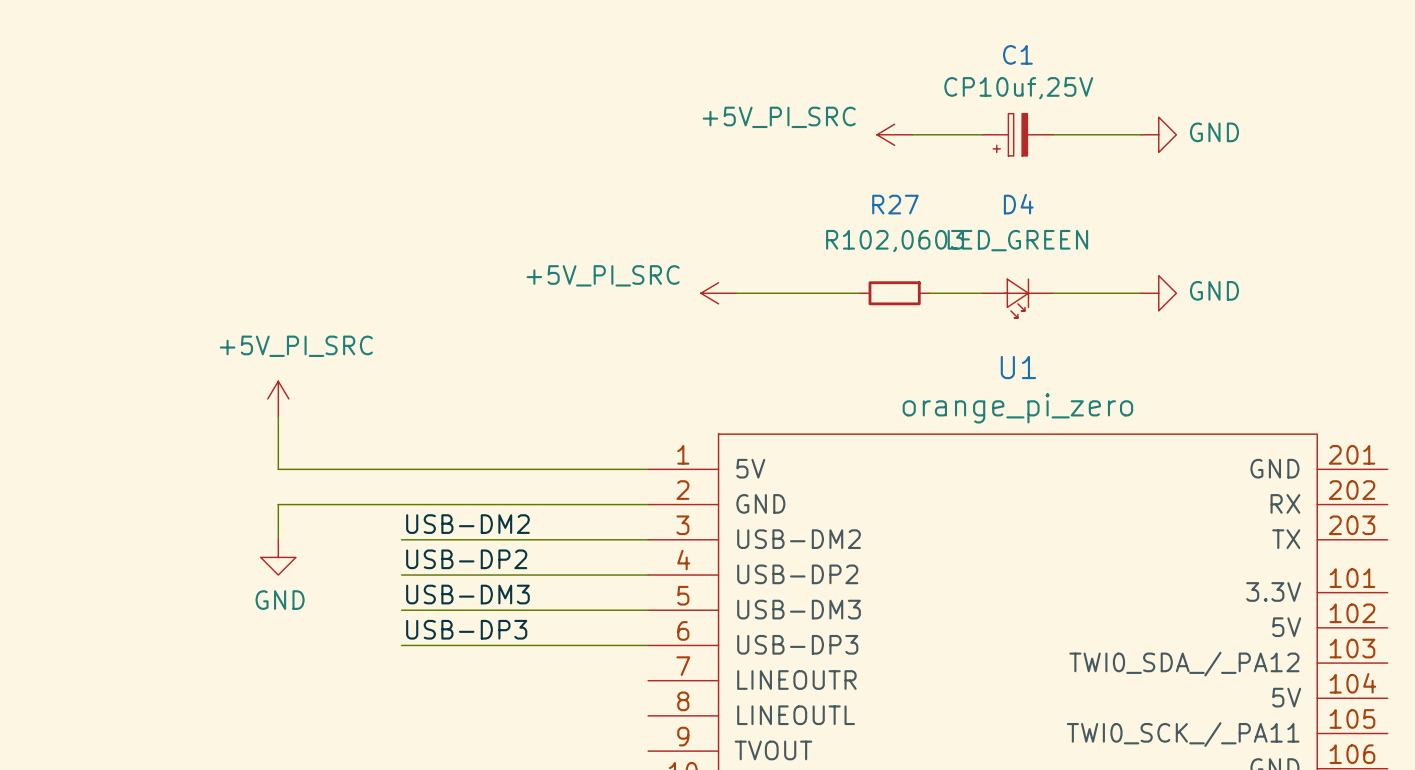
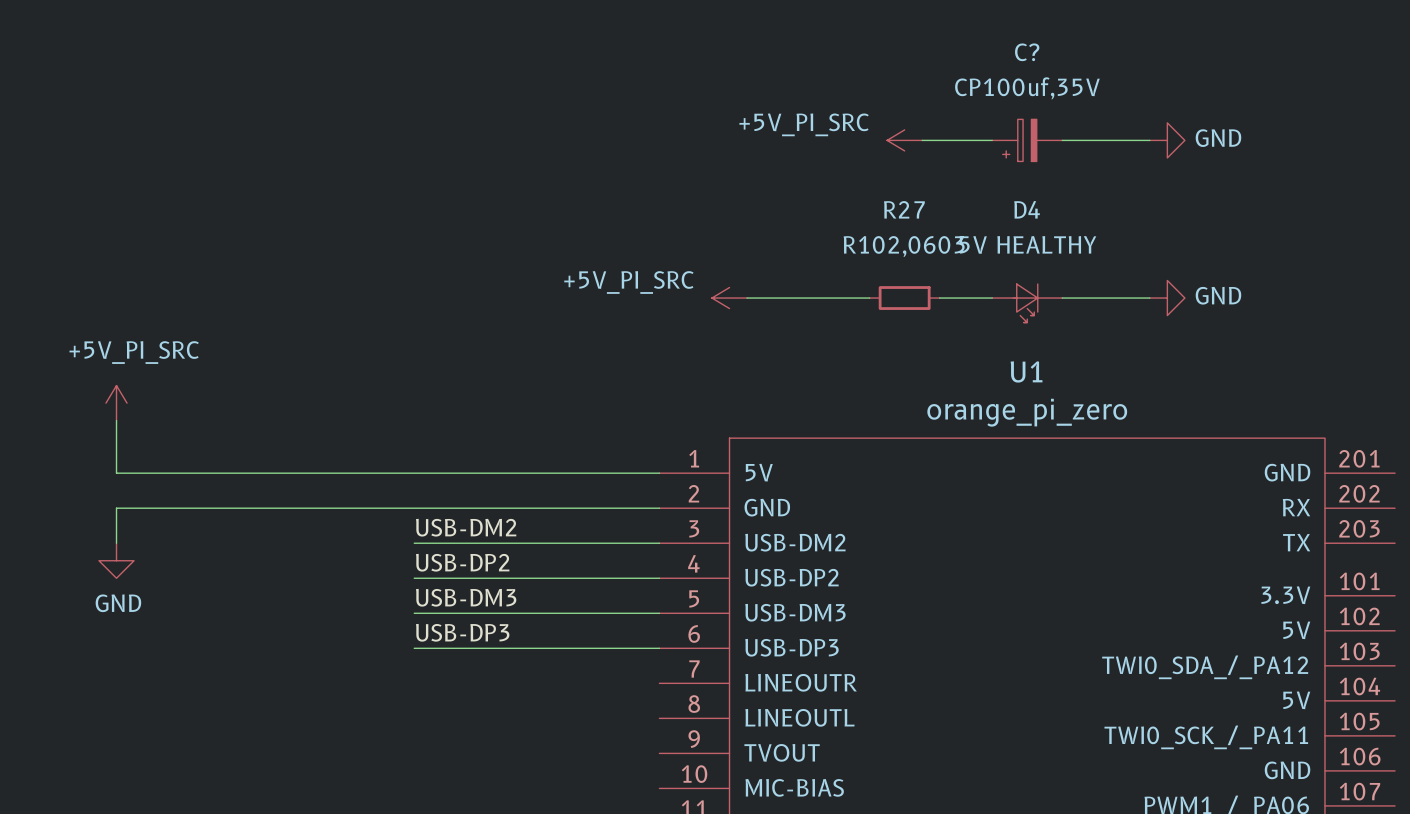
C1 name: C1 (1017, 54) -> C? (1027, 52)
C1 value: CP10uf,25V (1018, 88) -> CP100uf,35V (1027, 88)
D4 value: LED_GREEN (1017, 240) -> 5V HEALTHY (1028, 244)
power symbol position: +5V_PI_SRC (278, 398) -> +5V_PI_SRC (116, 403)
wire: (278, 416) (278, 469) -> (116, 420) (116, 473) (291, 473)
wire: (278, 504) (278, 539) -> (291, 508) (116, 508) (116, 543)
power symbol position: GND (278, 557) -> GND (116, 560)

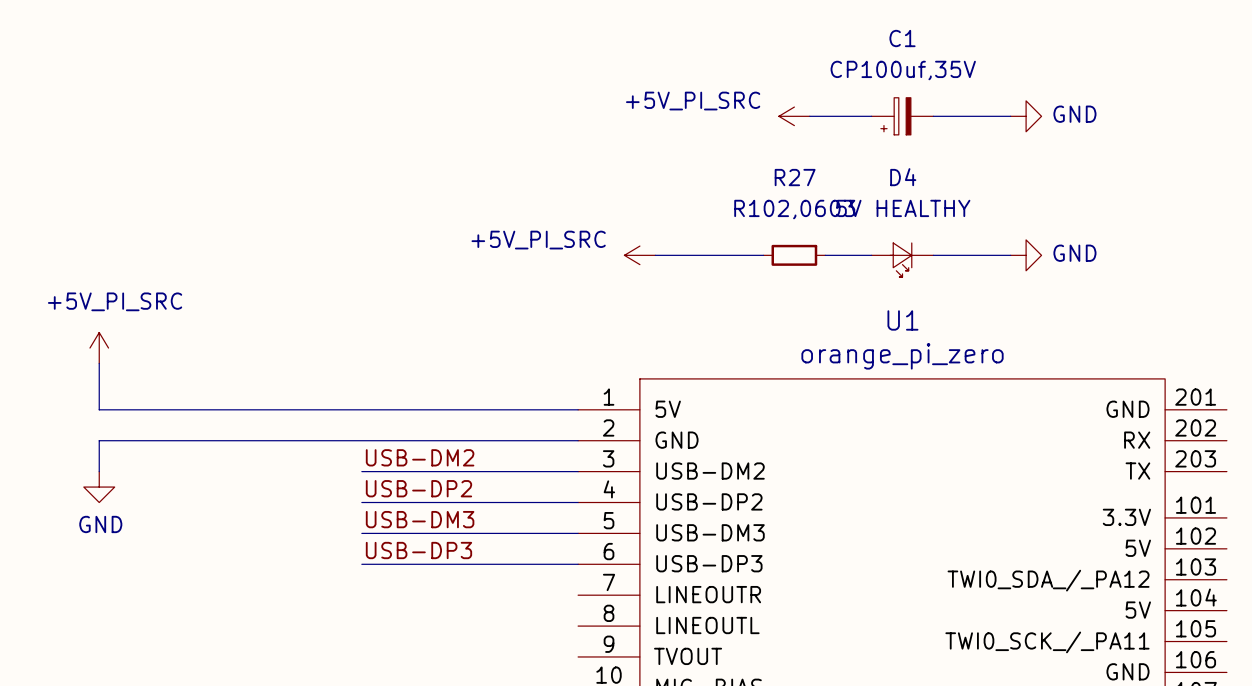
C? name: C? (1027, 52) -> C1 (902, 38)

